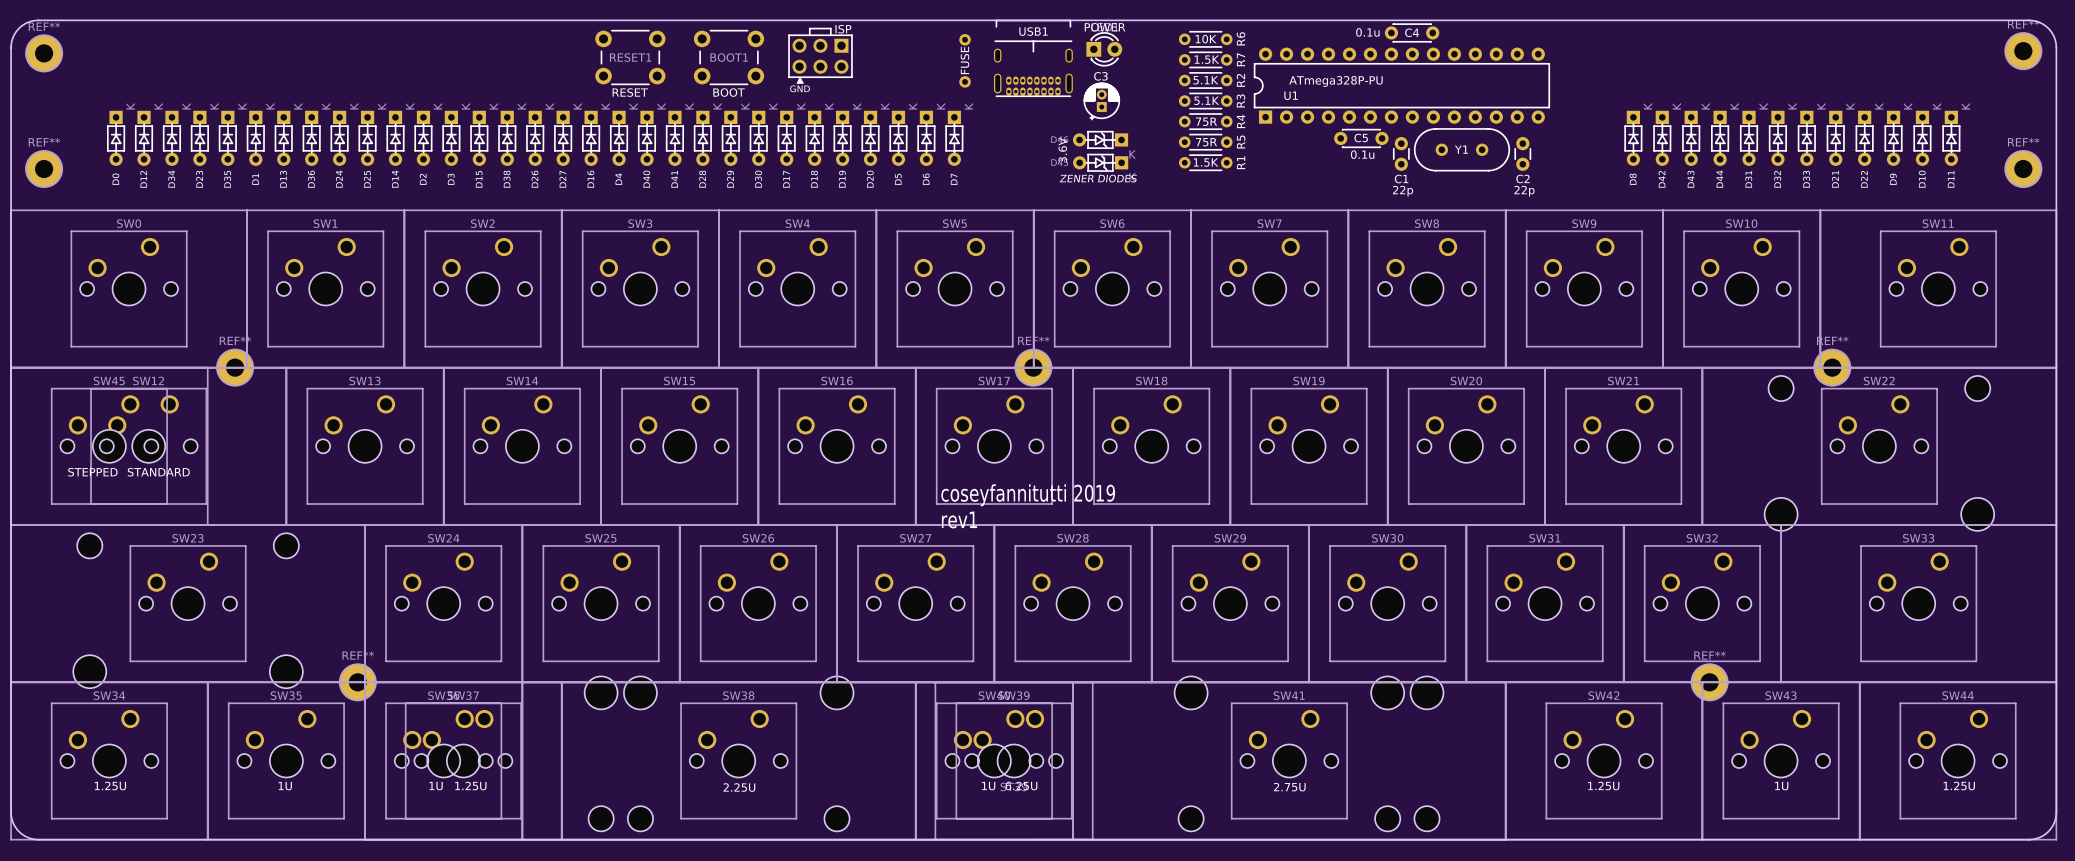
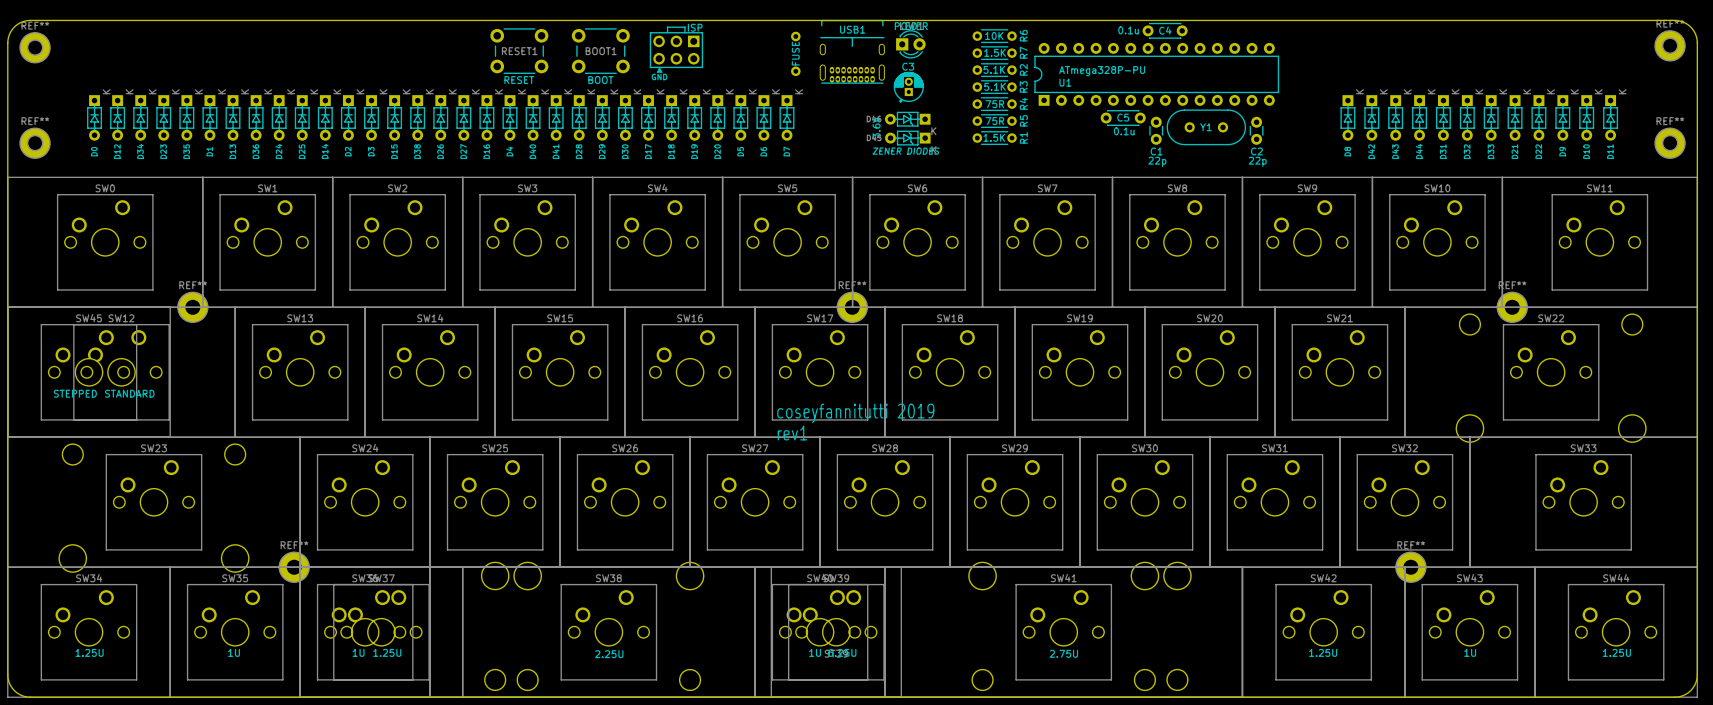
drawing: none -> [1661, 37, 1679, 54]
drawing: none -> [26, 39, 44, 56]
drawing: none -> [26, 134, 44, 152]
drawing: none -> [1661, 134, 1679, 152]

